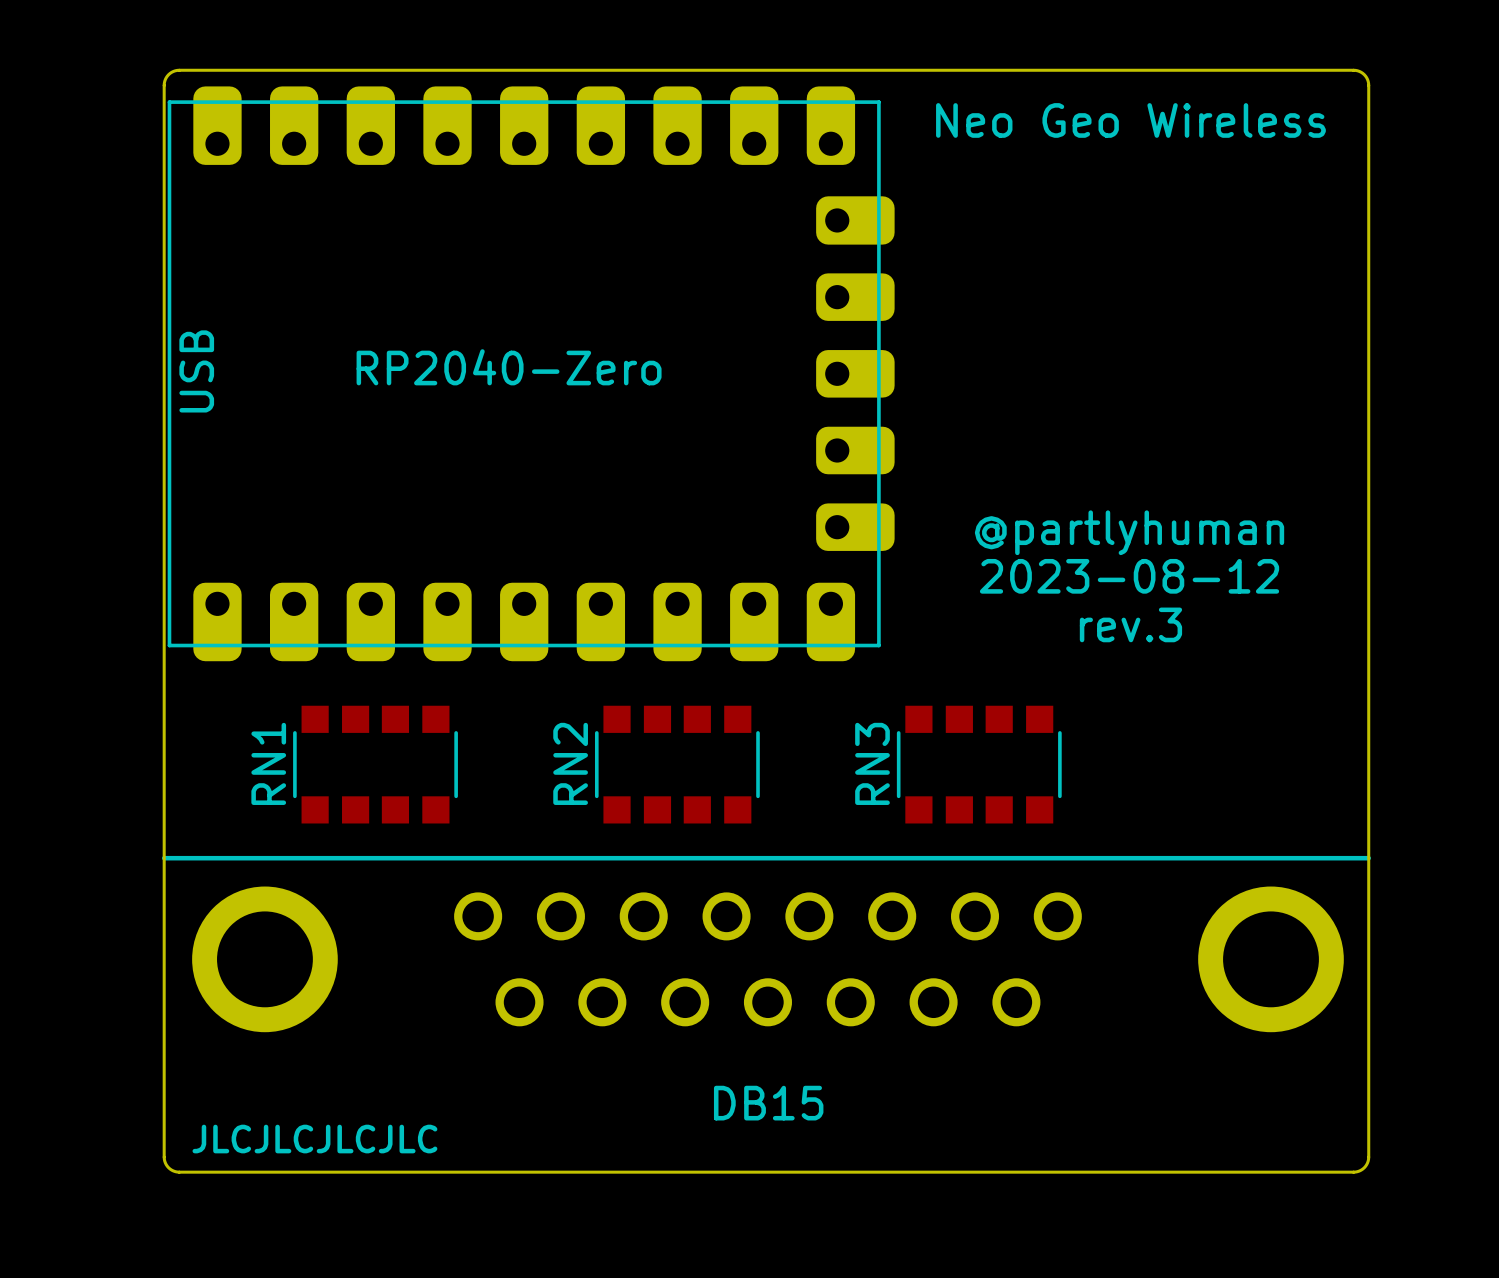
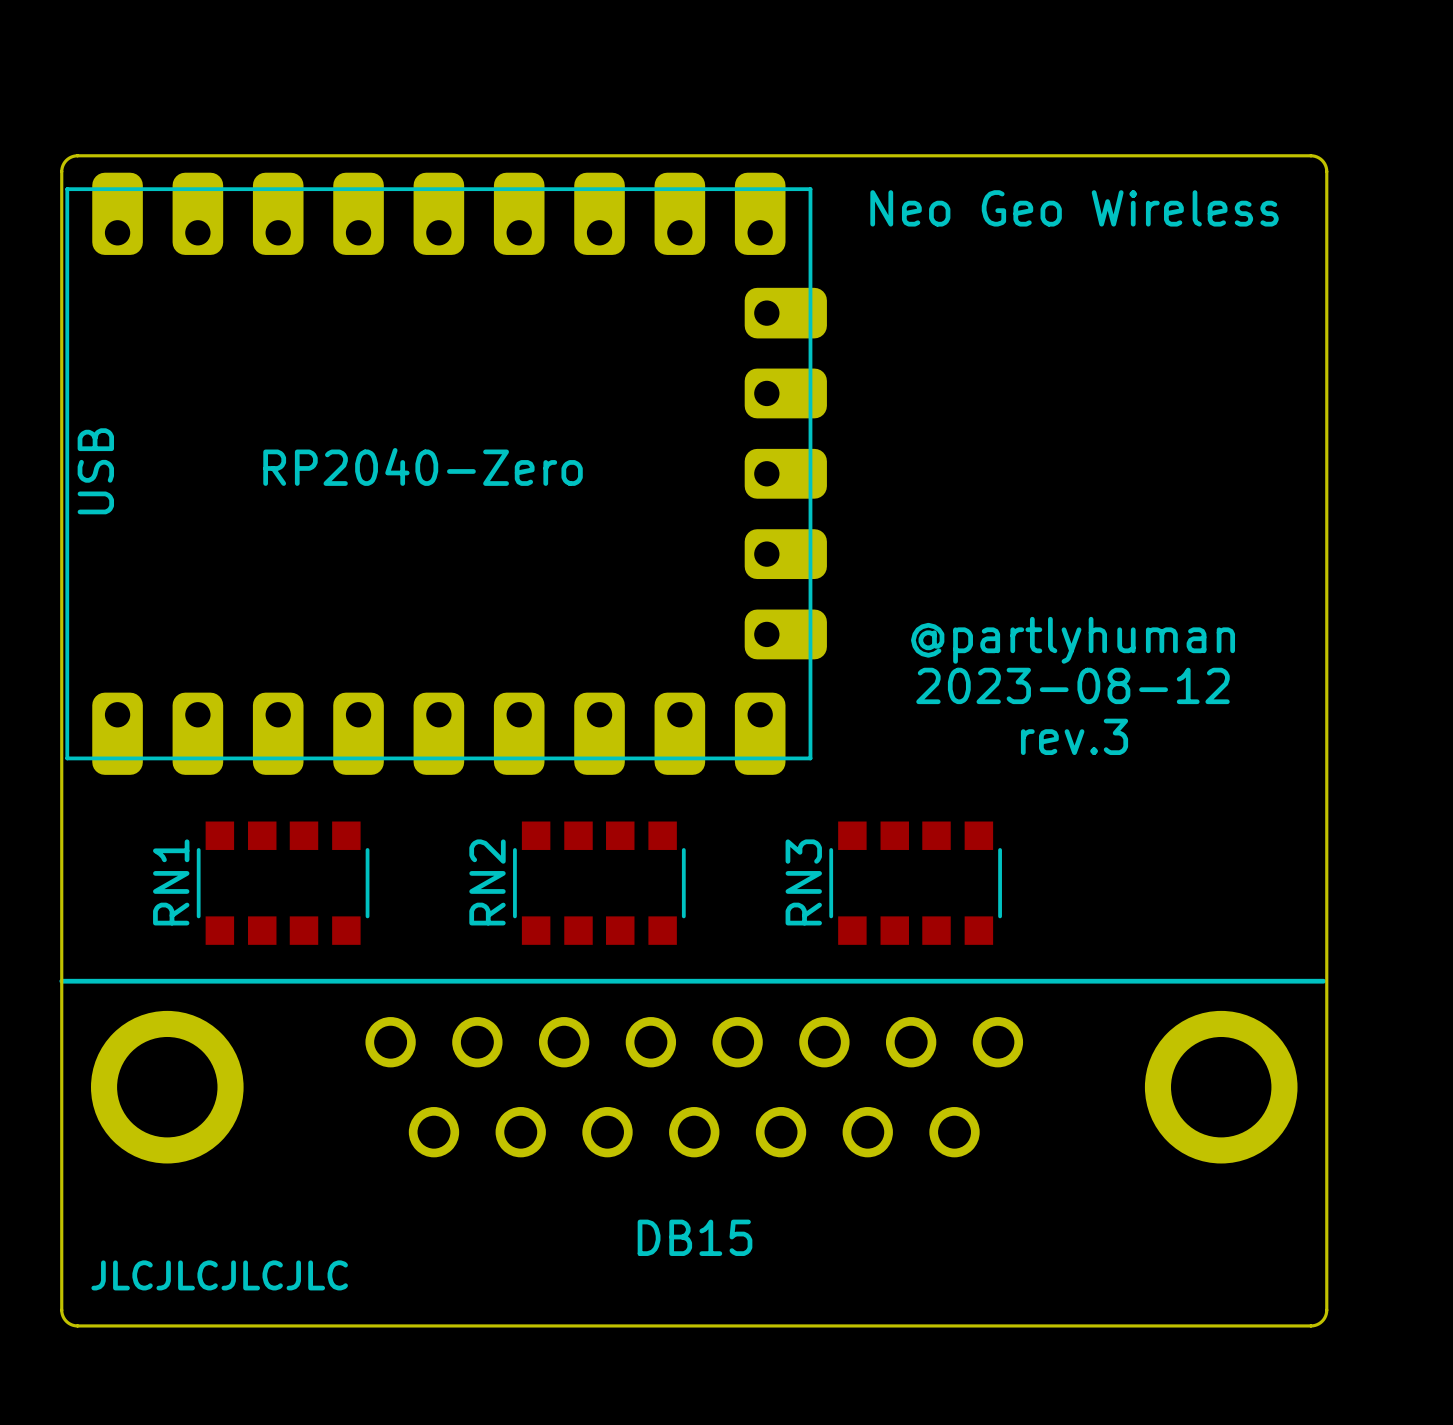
board edge: (1353, 70) (1364, 74) (1368, 85) (1368, 1157) (1364, 1167) (1353, 1172) (179, 1172) (168, 1167) (164, 1157) -> (1307, 155) (1320, 159) (1324, 163) (1326, 171) (1326, 1310) (1322, 1321) (1310, 1325) (77, 1325) (69, 1323) (63, 1318) (61, 1294)

